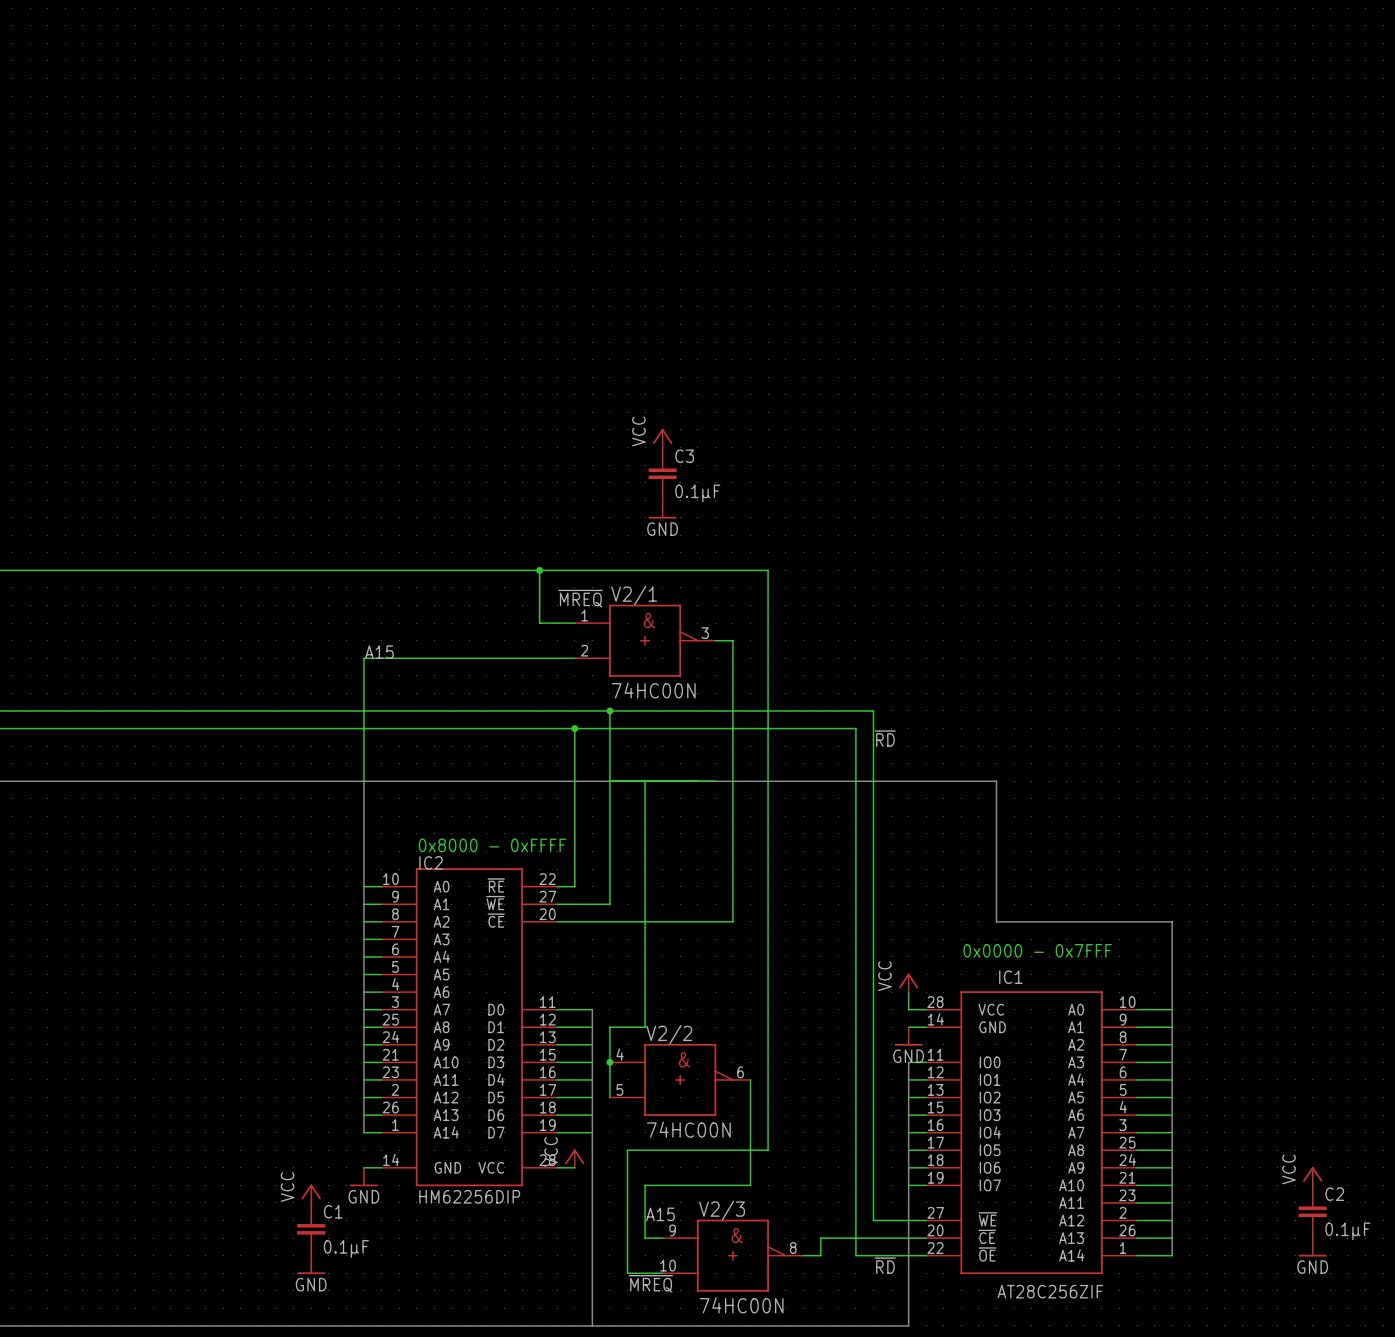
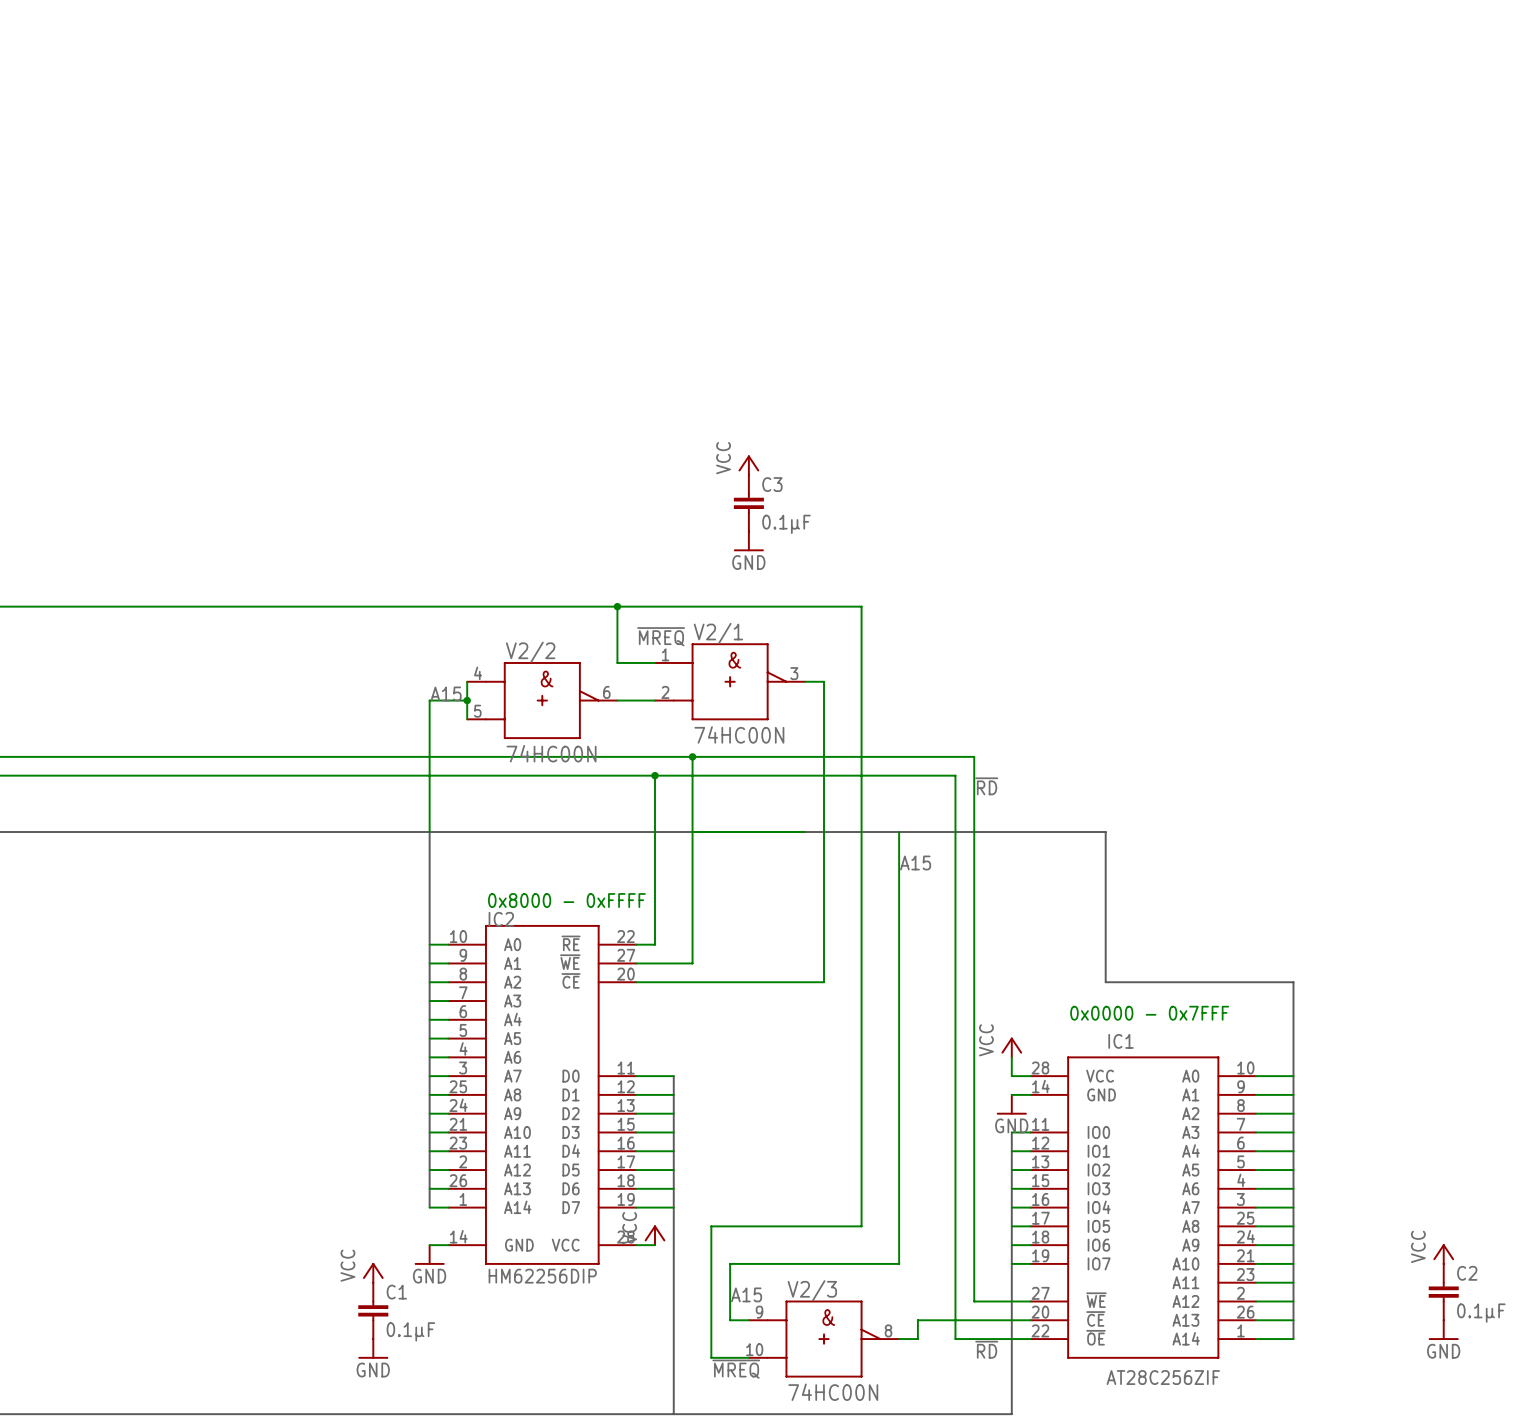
wire: none -> (467, 681) (467, 719)
wire: (399, 658) (539, 658) -> none
junction: none -> (467, 700)
wire: (645, 781) (645, 1027) (609, 1027) (609, 1097) -> none
label: none -> A15 (915, 862)
junction: (609, 1062) -> none
V2/2 position: (680, 1079) -> (542, 700)
wire: (750, 1079) (750, 1185) -> (899, 832) (899, 1263) (842, 1263)

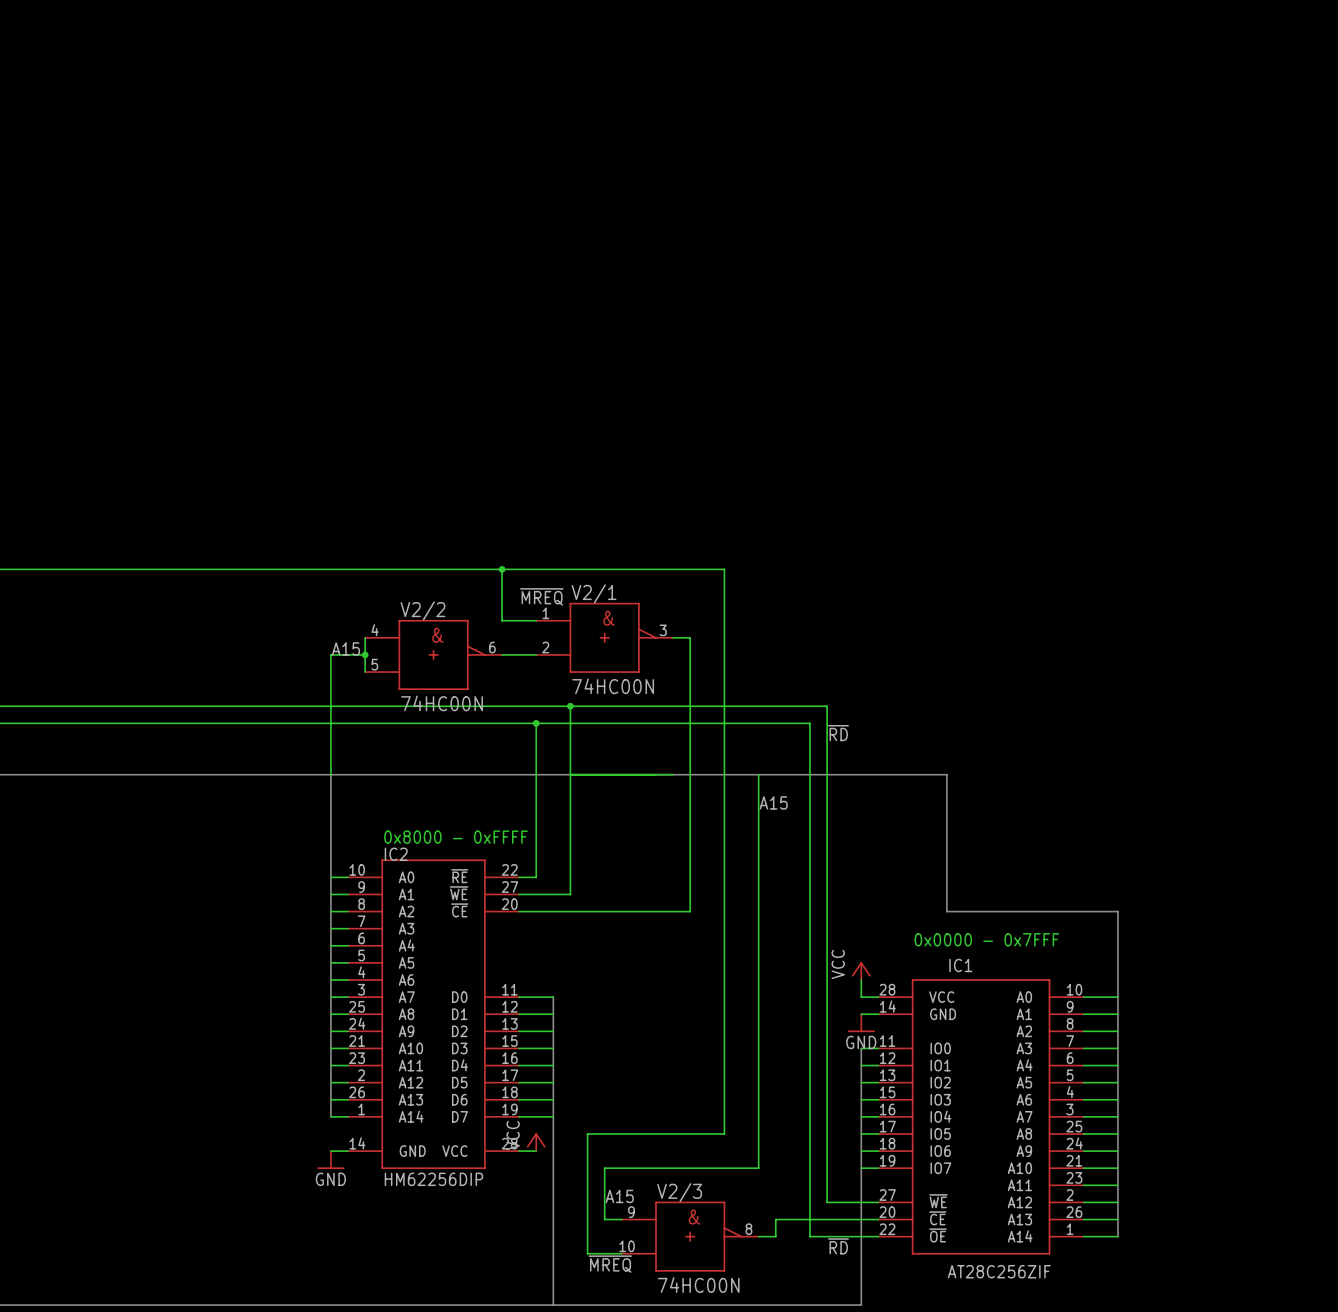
power symbol: VCC (748, 465) -> none
C3: 0.1µF (748, 503) -> none
power symbol: GND (748, 541) -> none
power symbol: VCC (1443, 1254) -> none
power symbol: VCC (373, 1272) -> none
C2: 0.1µF (1443, 1292) -> none
C1: 0.1µF (373, 1310) -> none
power symbol: GND (1443, 1330) -> none
power symbol: GND (373, 1348) -> none

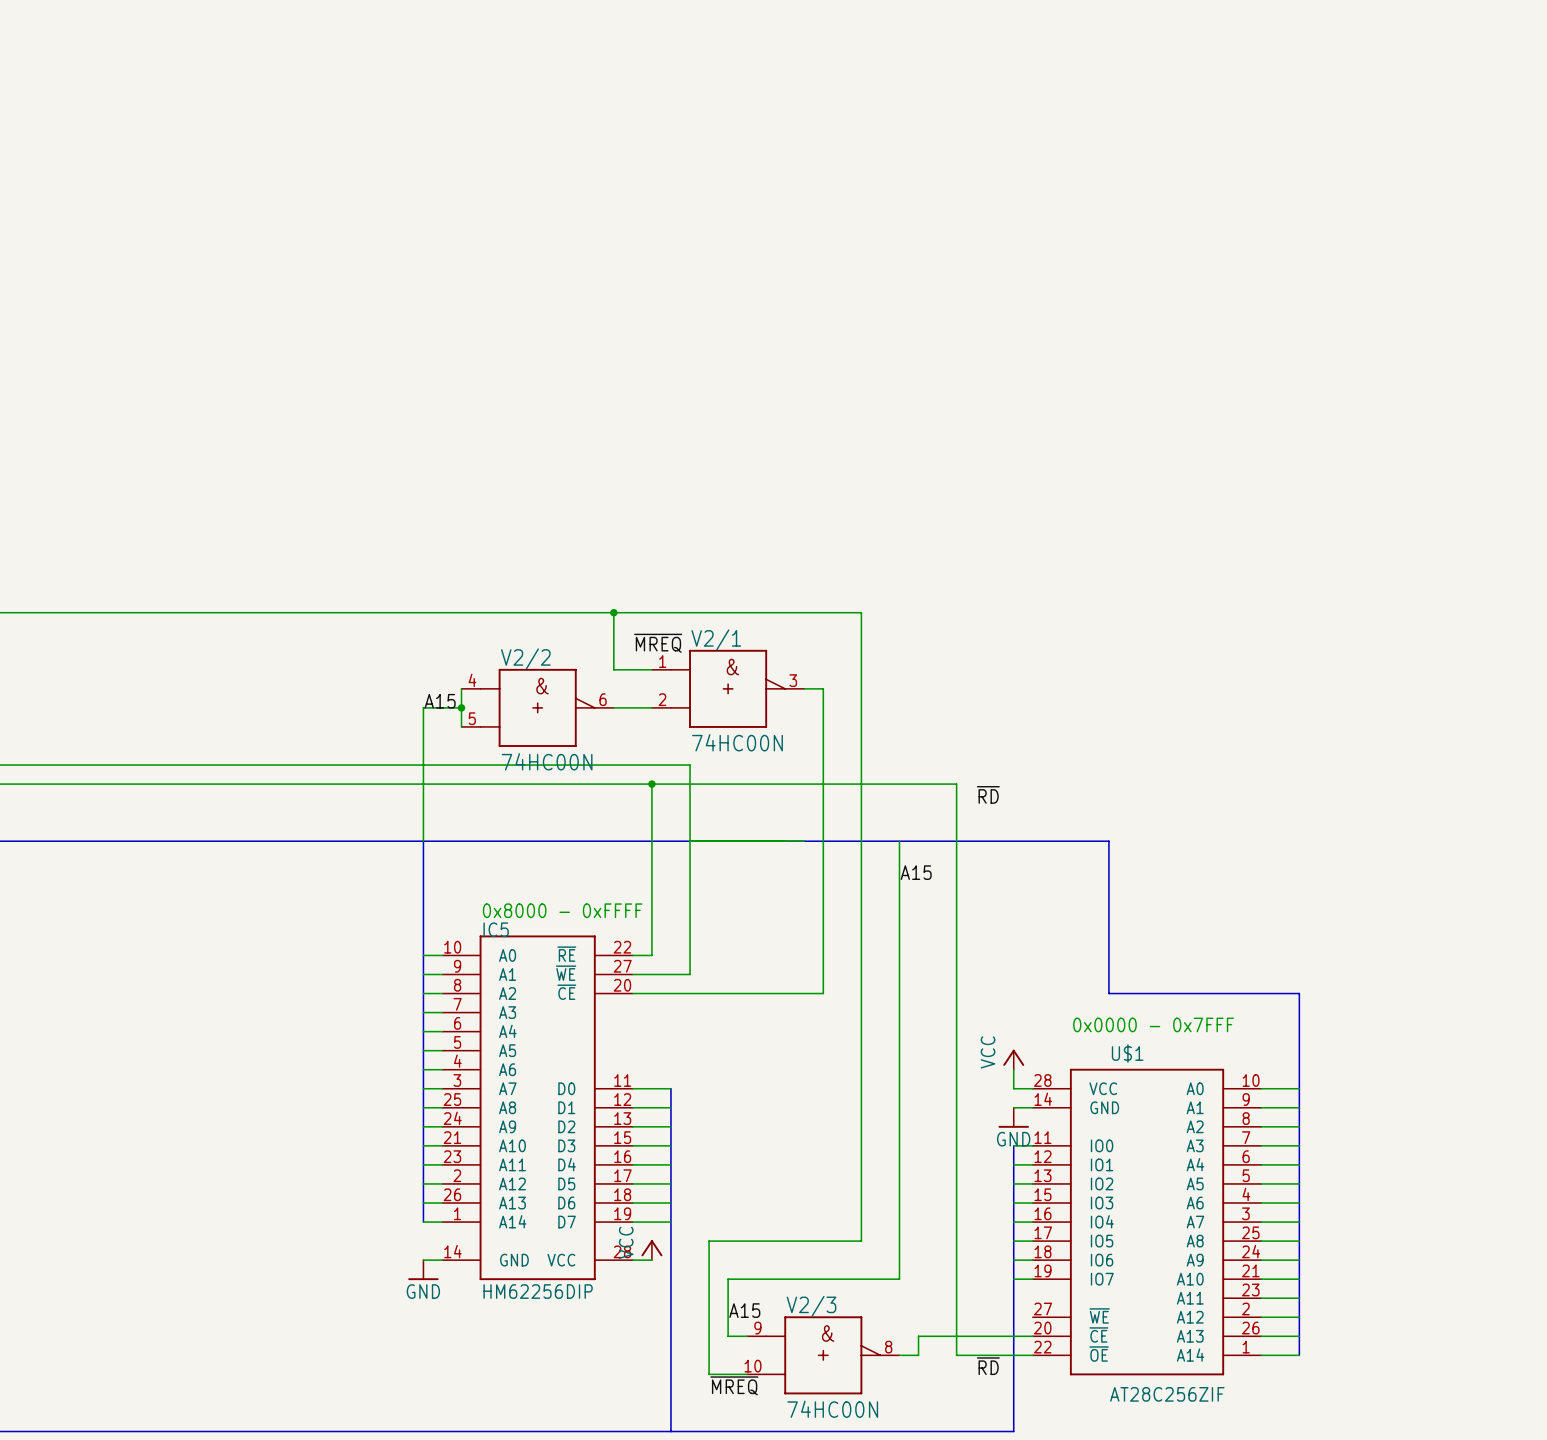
wire: (570, 706) (827, 706) (827, 1202) (878, 1202) -> none
junction: (570, 706) -> none
IC2 name: IC2 (396, 854) -> IC5 (496, 929)
IC1 name: IC1 (960, 965) -> U$1 (1127, 1053)

